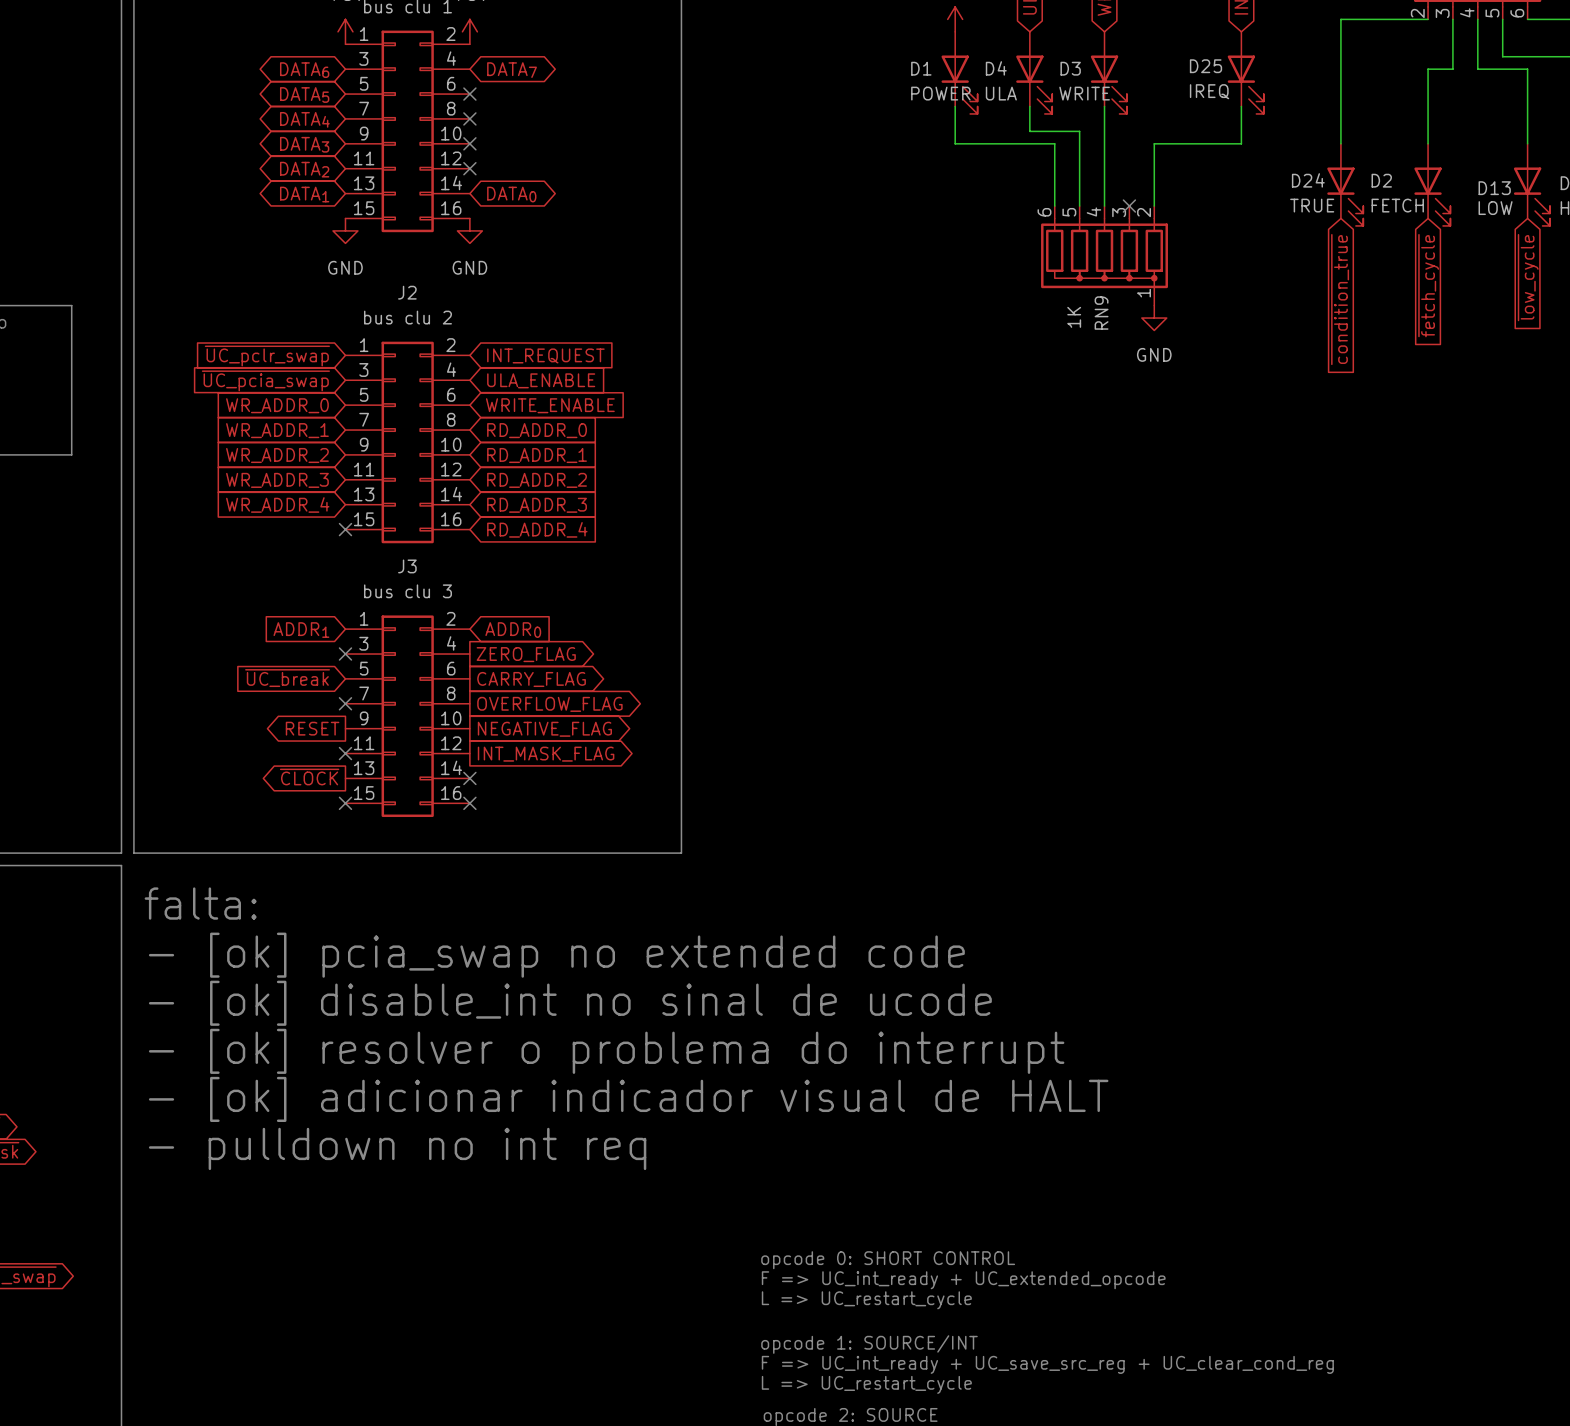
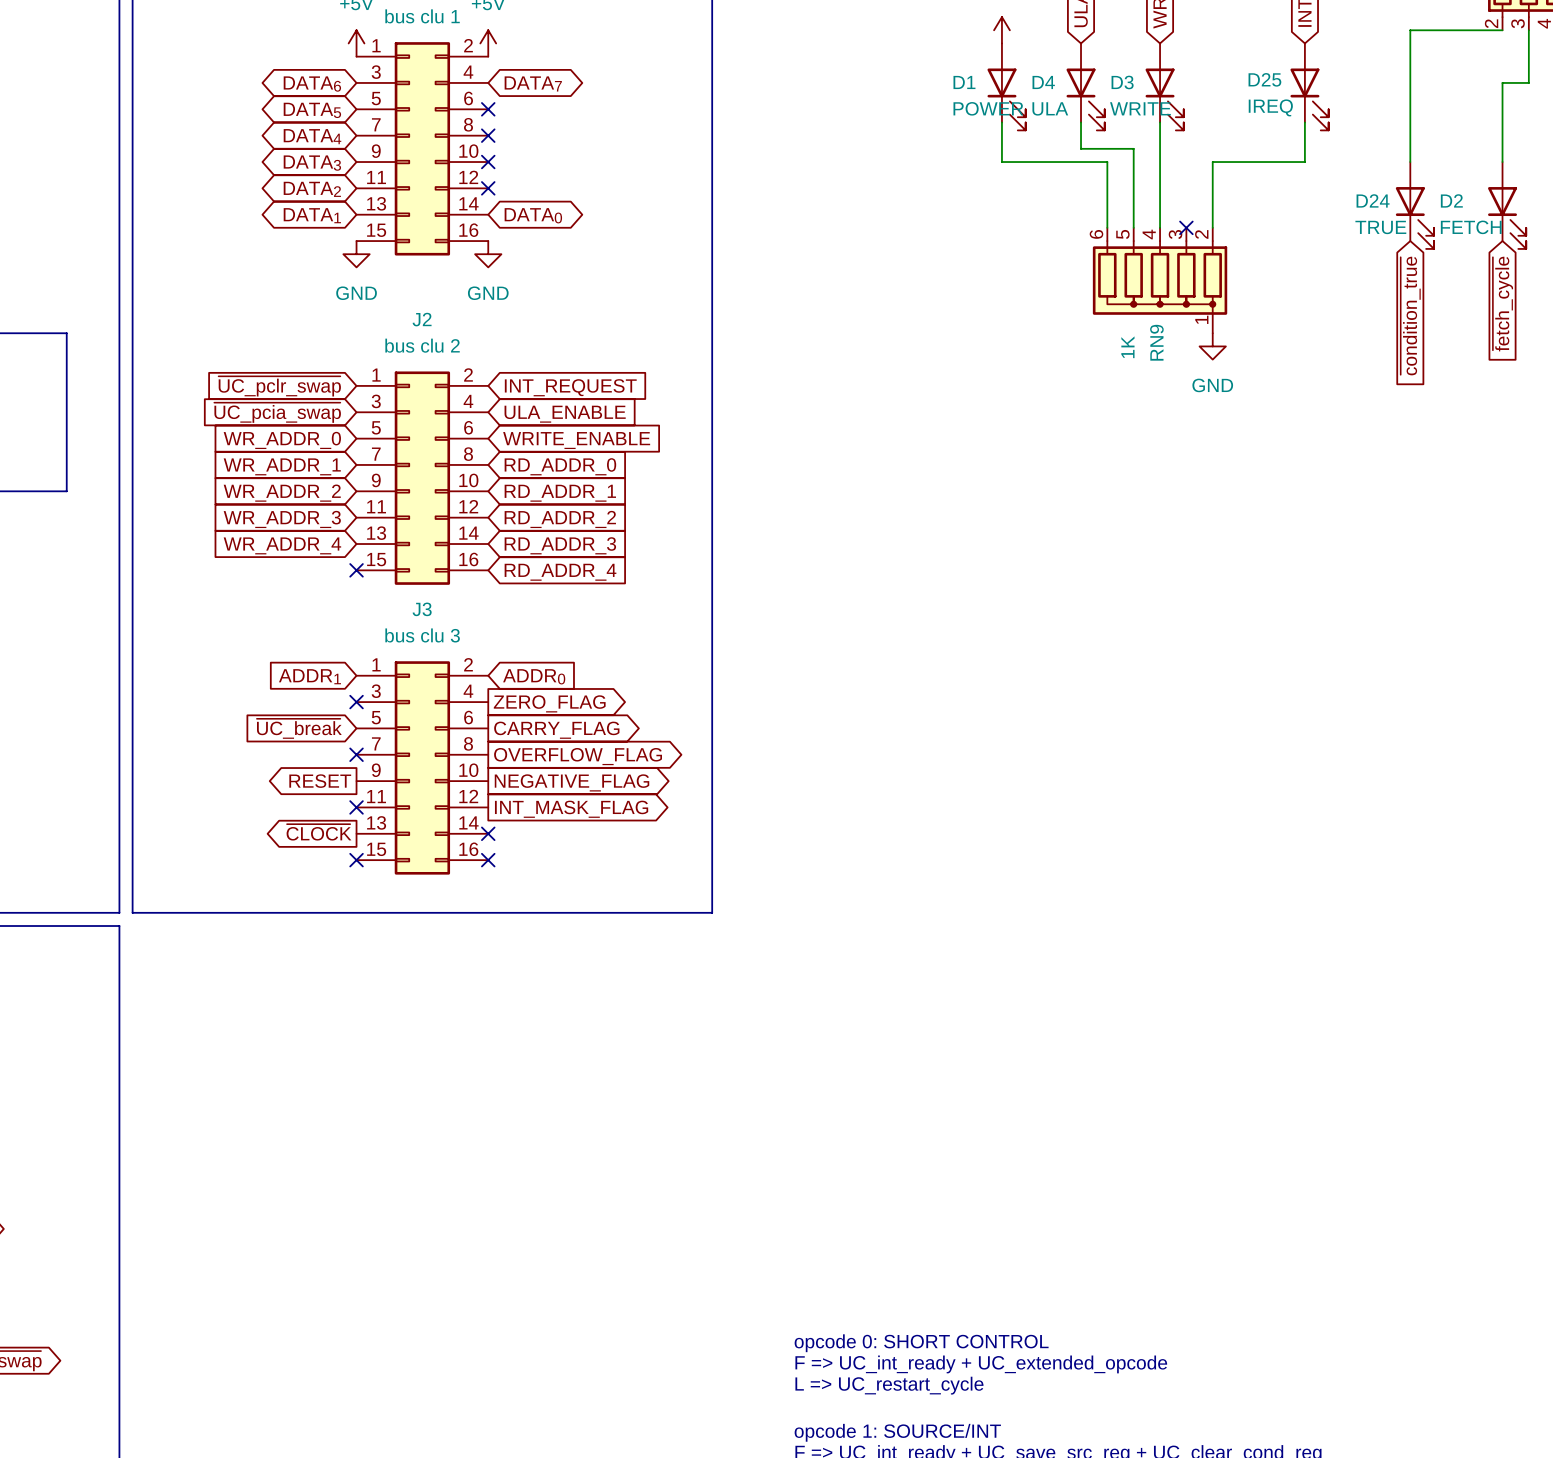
text: falta: (200, 903) -> none
text: - [ok] pcia_swap no extended code (556, 955) -> none
text: - [ok] disable_int no sinal de ucode (570, 1003) -> none
text: - [ok] resolver o problema do interrupt (606, 1051) -> none
text: - [ok] adicionar indicador visual de HALT (628, 1099) -> none
text: - pulldown no int req (397, 1148) -> none

